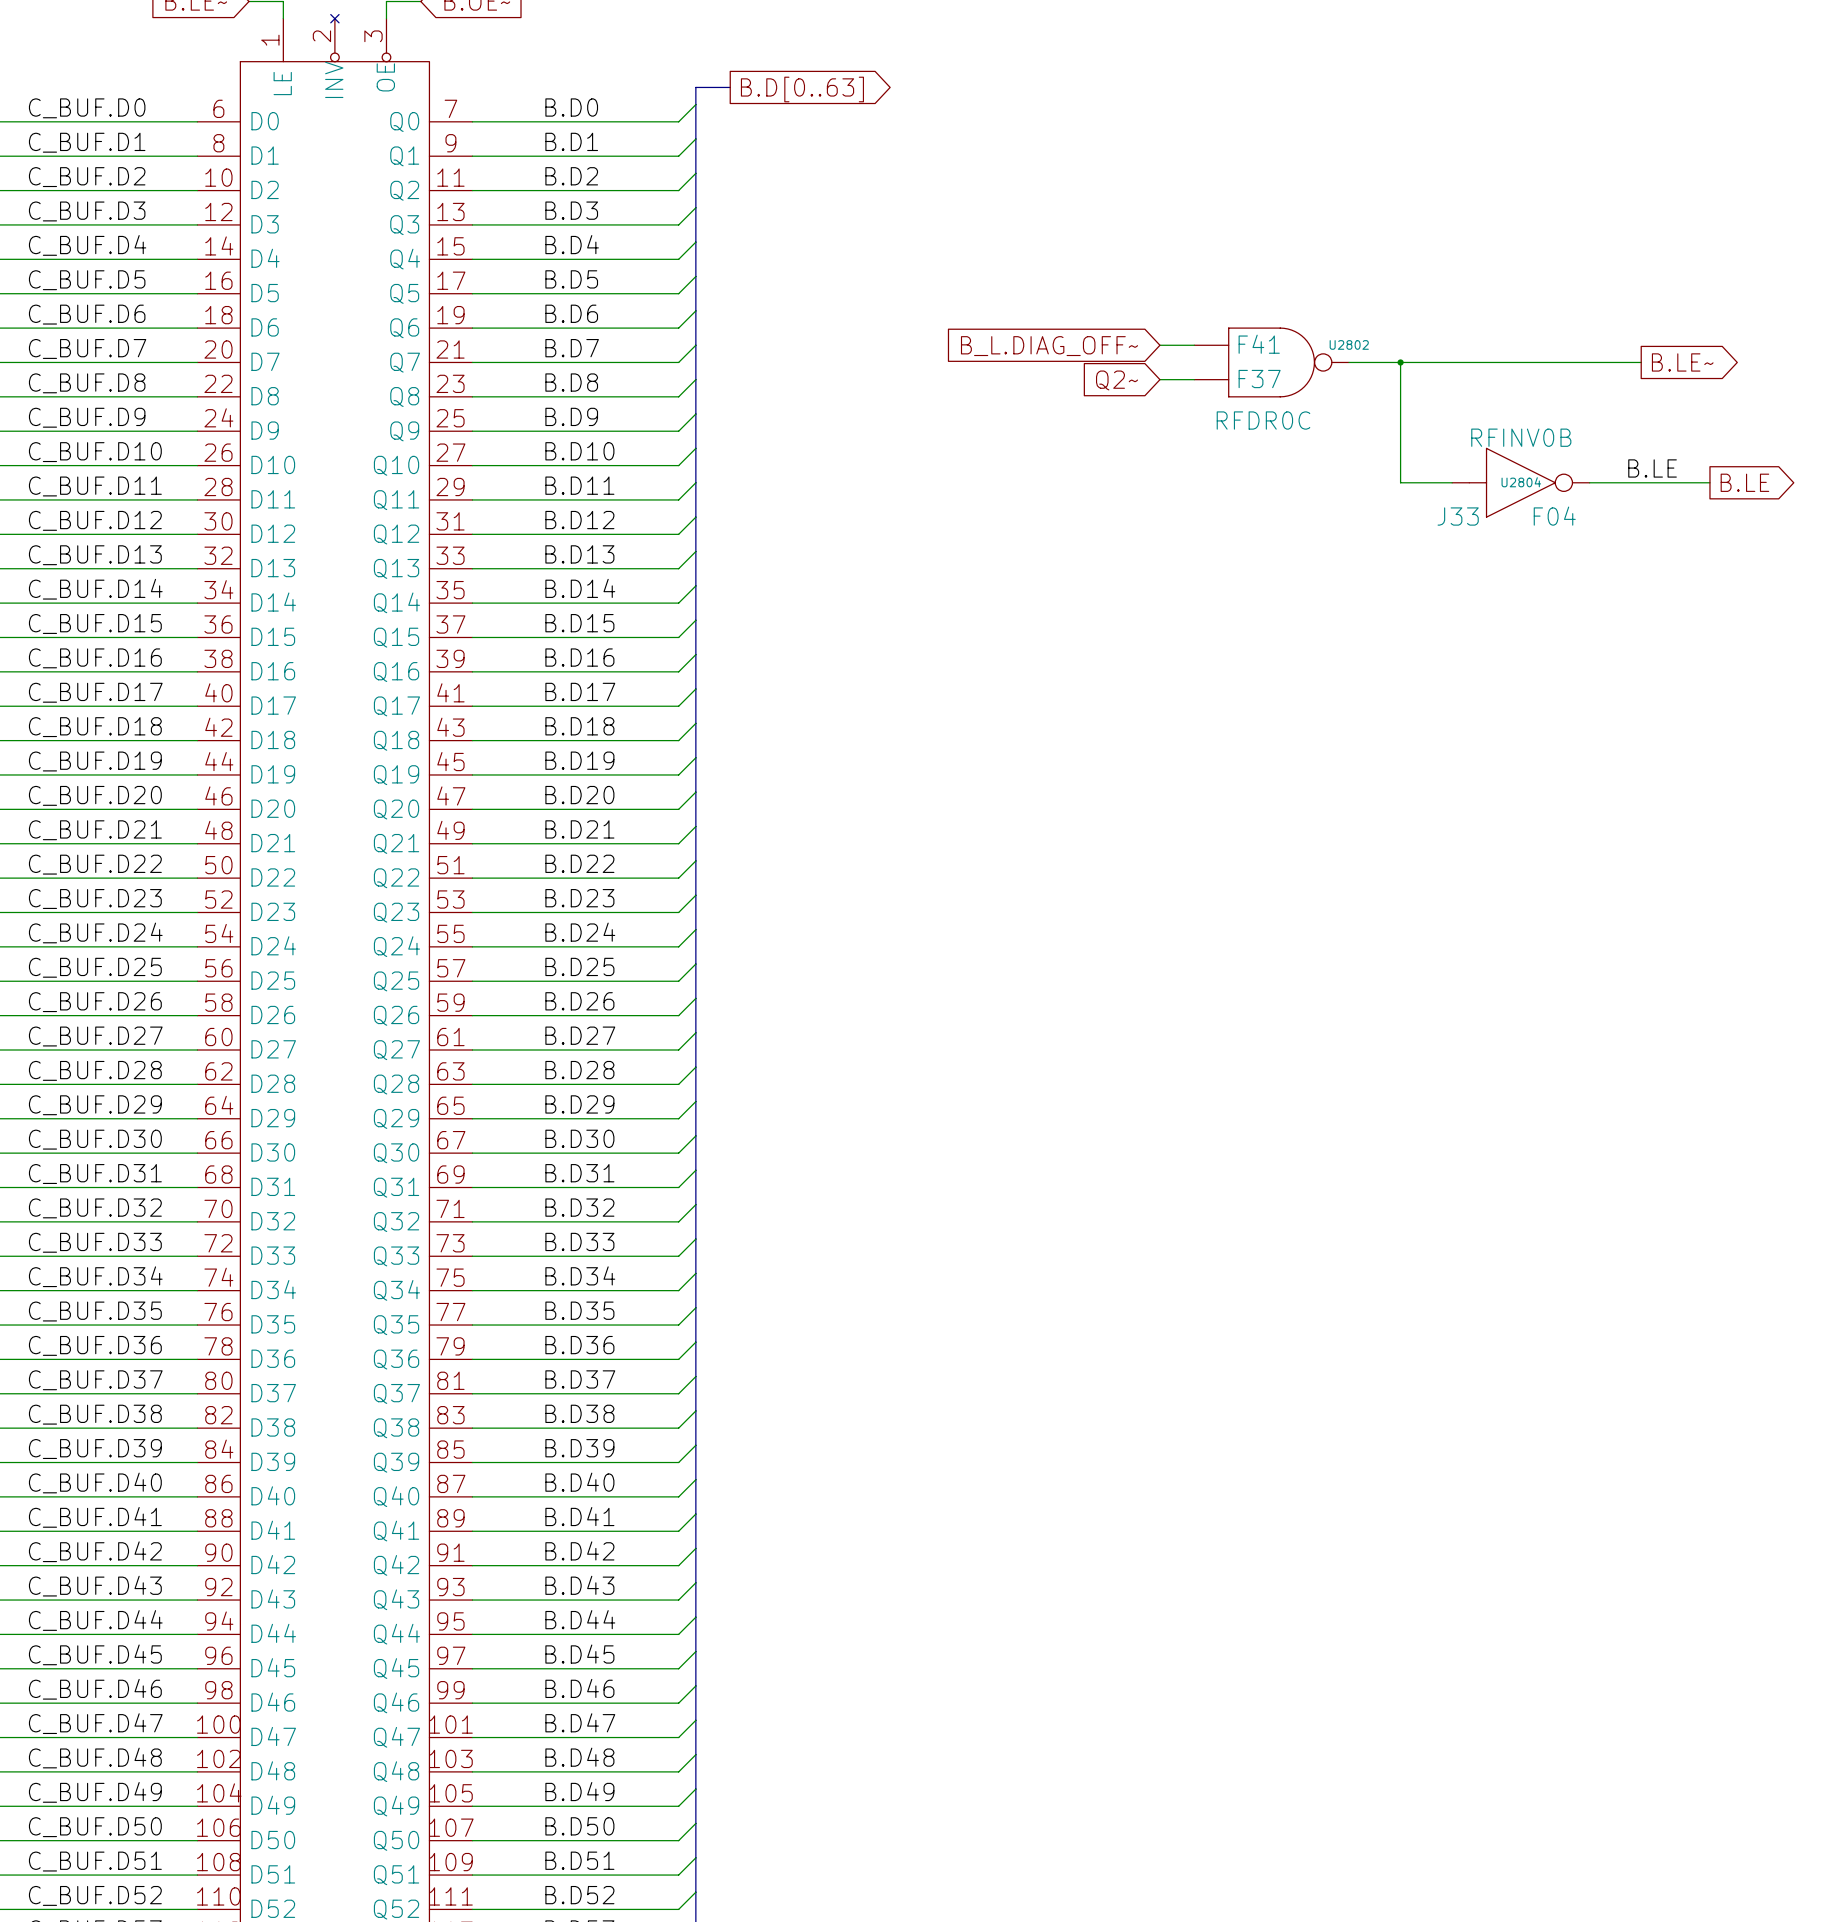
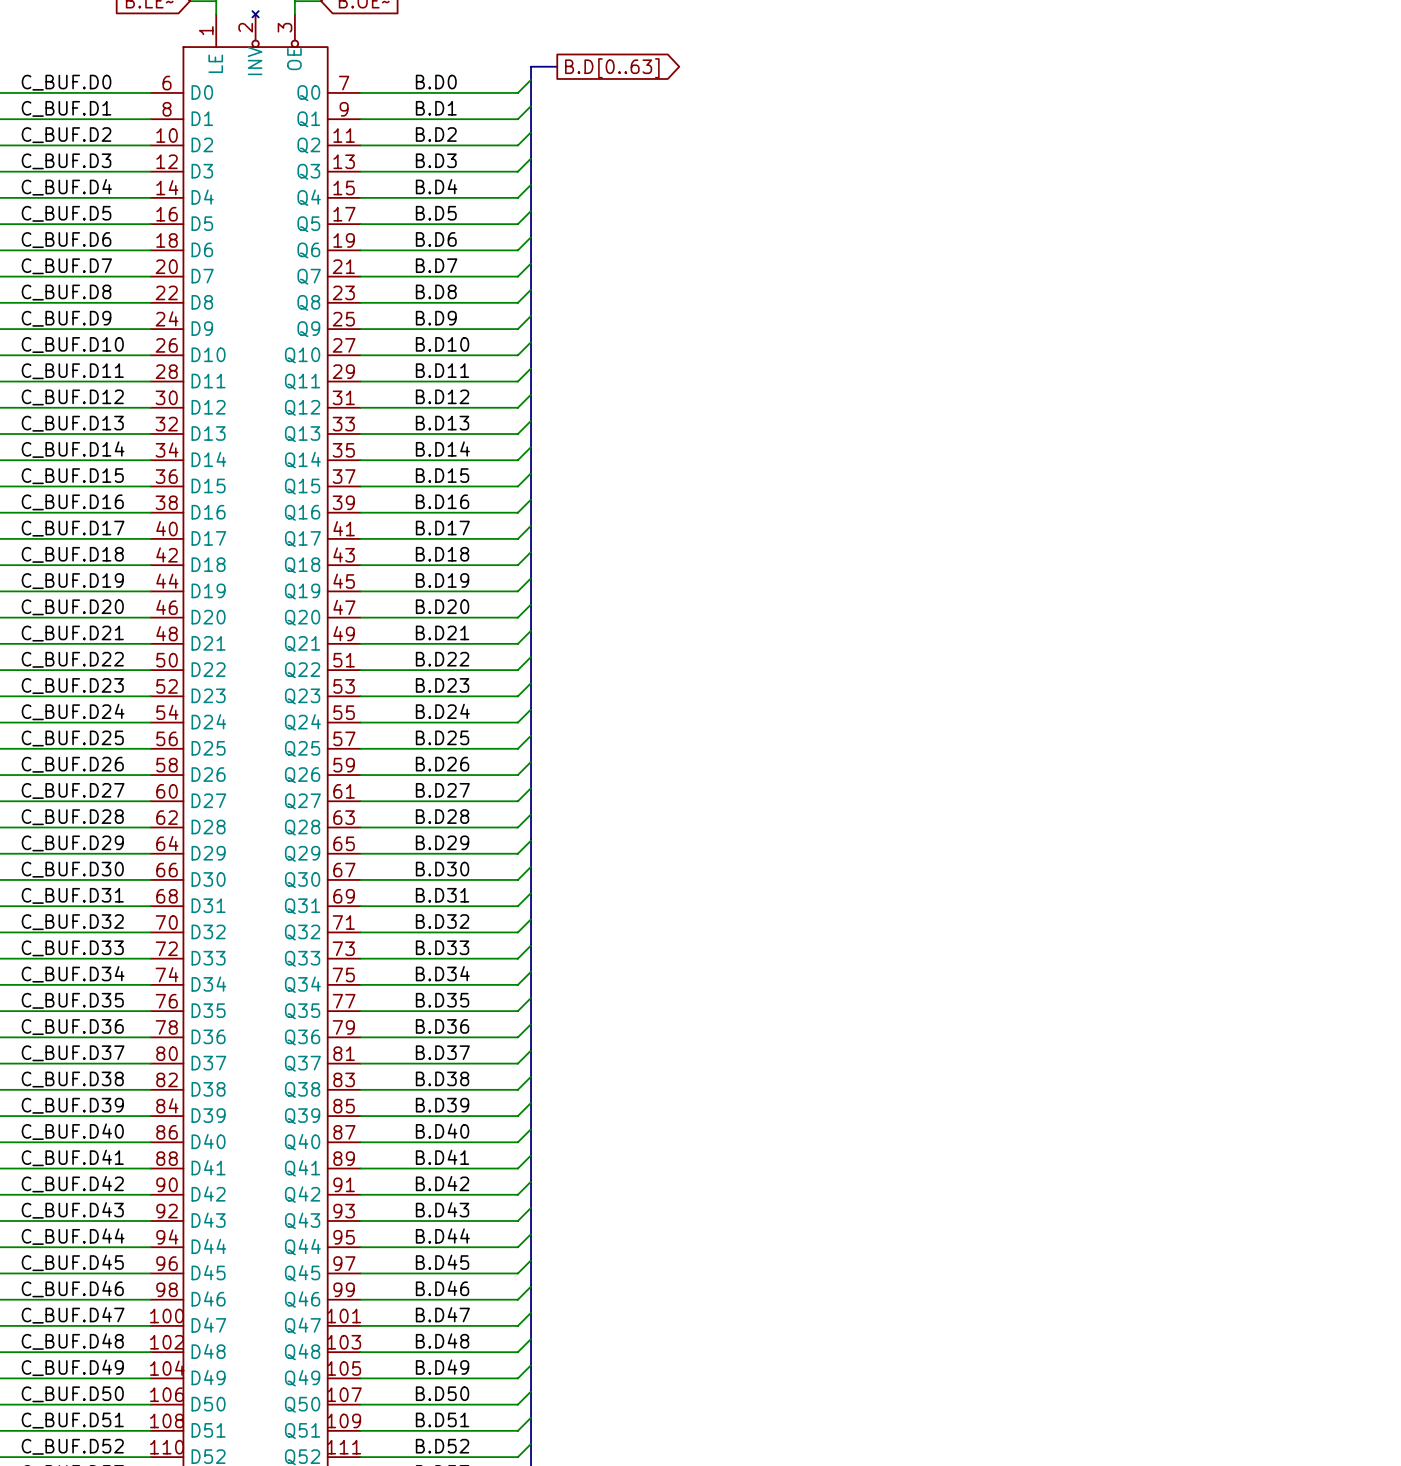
wire: (1159, 345) (1194, 345) -> none
global label: B_L.DIAG_OFF~ (1049, 346) -> none
U2802: F37 (1271, 362) -> none
wire: (1349, 362) (1641, 362) -> none
wire: (1400, 362) (1400, 482) (1452, 482) -> none
junction: (1400, 362) -> none
global label: B.LE~ (1682, 362) -> none
wire: (1159, 379) (1194, 379) -> none
global label: Q2~ (1117, 380) -> none
label: B.LE (1652, 468) -> none
U2804: F04 (1520, 482) -> none
wire: (1589, 482) (1709, 482) -> none
global label: B.LE (1744, 482) -> none

